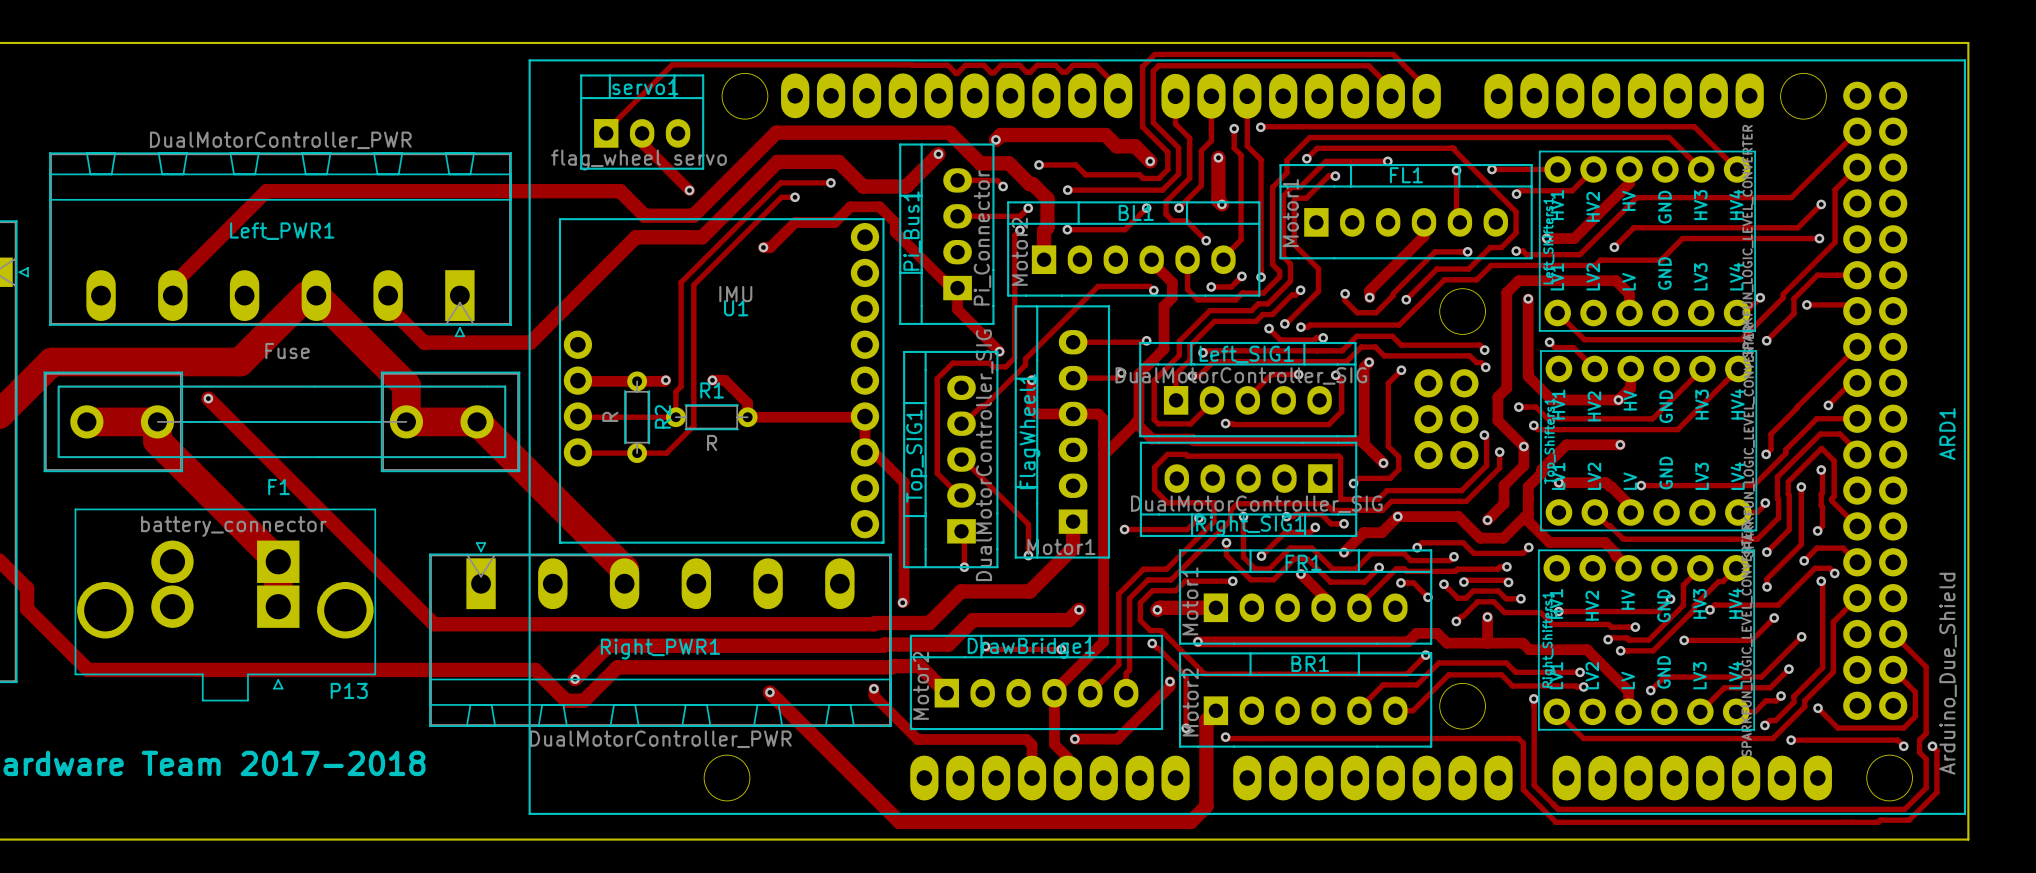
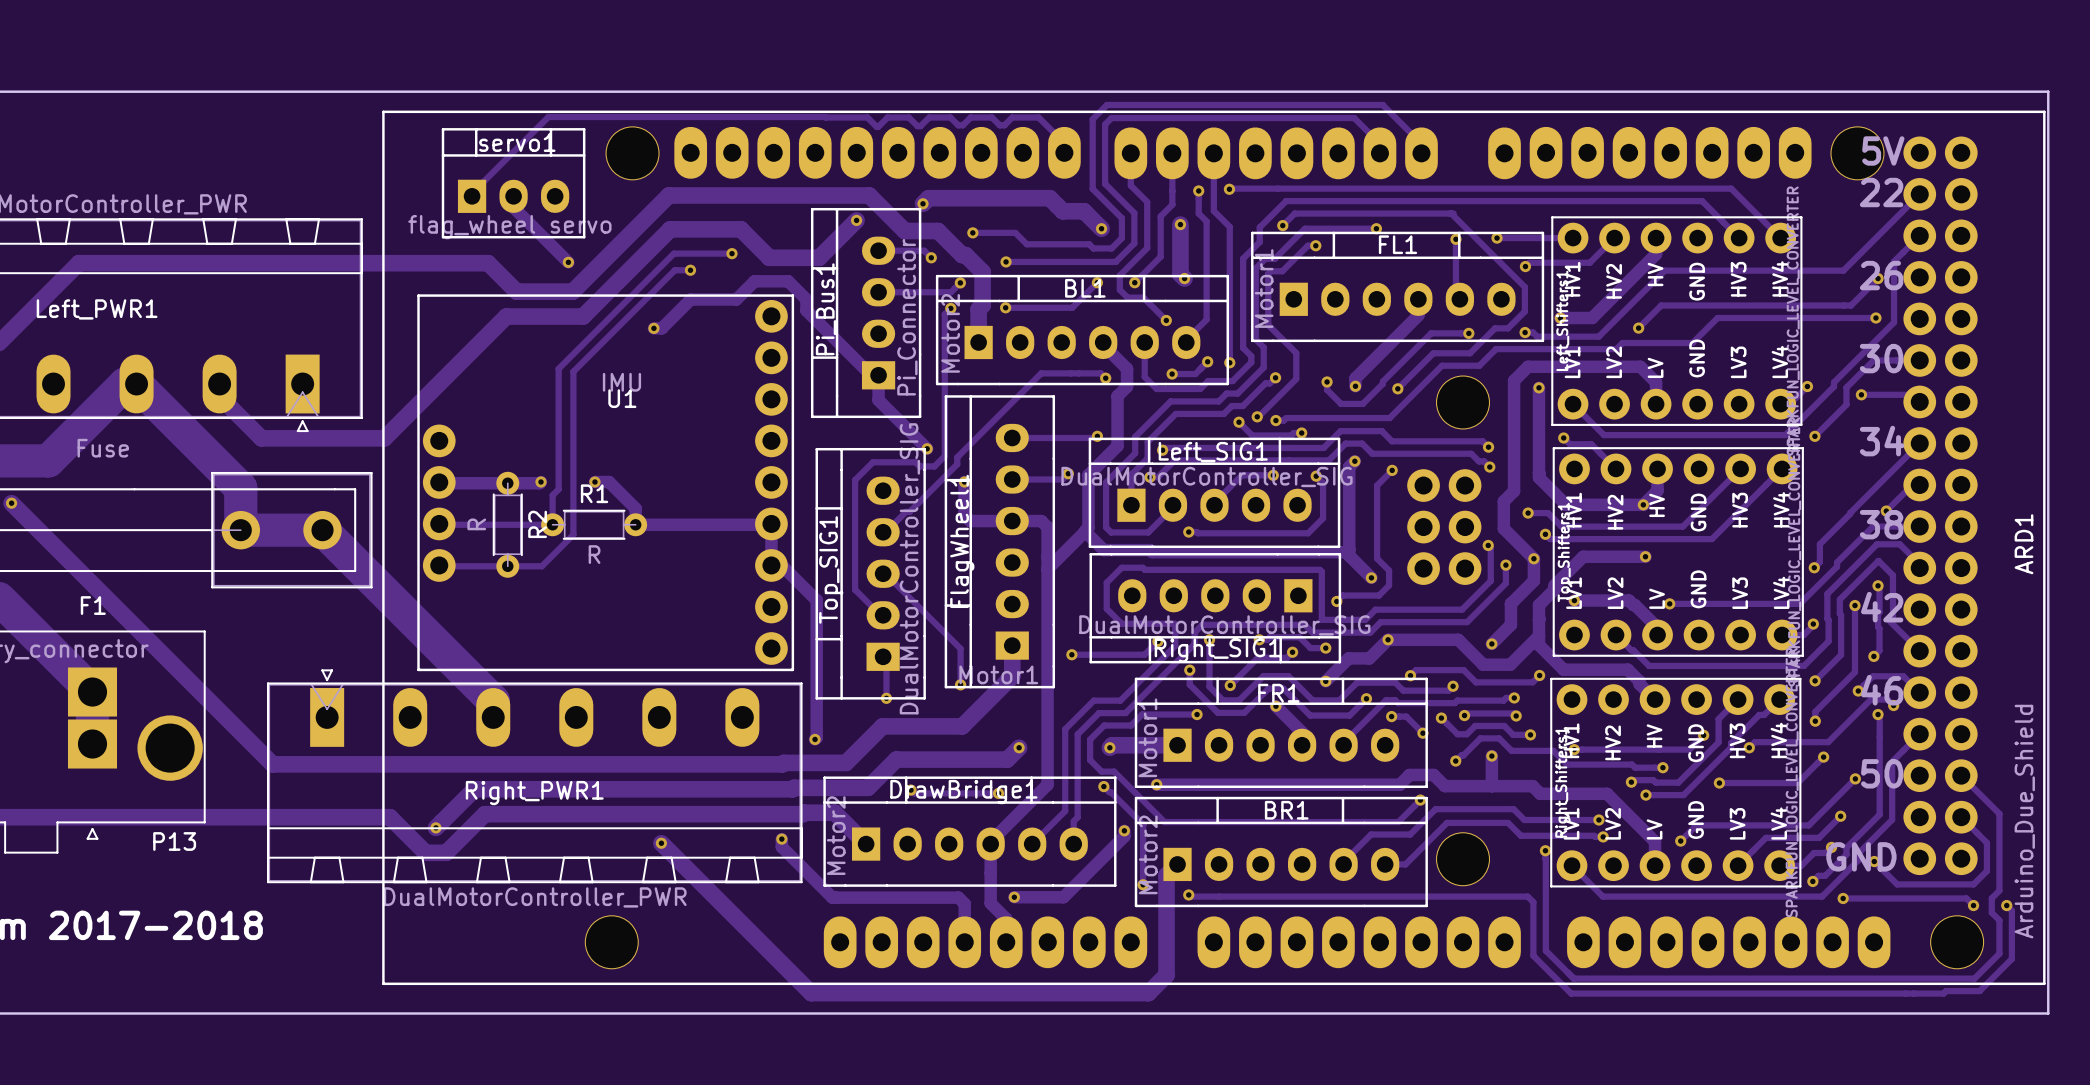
text: none -> 5V (1883, 150)
text: none -> 22 (1881, 192)
text: none -> 26 (1881, 275)
text: none -> 30 (1881, 358)
text: none -> 34 (1882, 441)
text: none -> 38 (1881, 524)
text: none -> 42 (1882, 607)
text: none -> 46 (1882, 690)
text: none -> 50 (1882, 773)
text: none -> GND (1861, 856)

